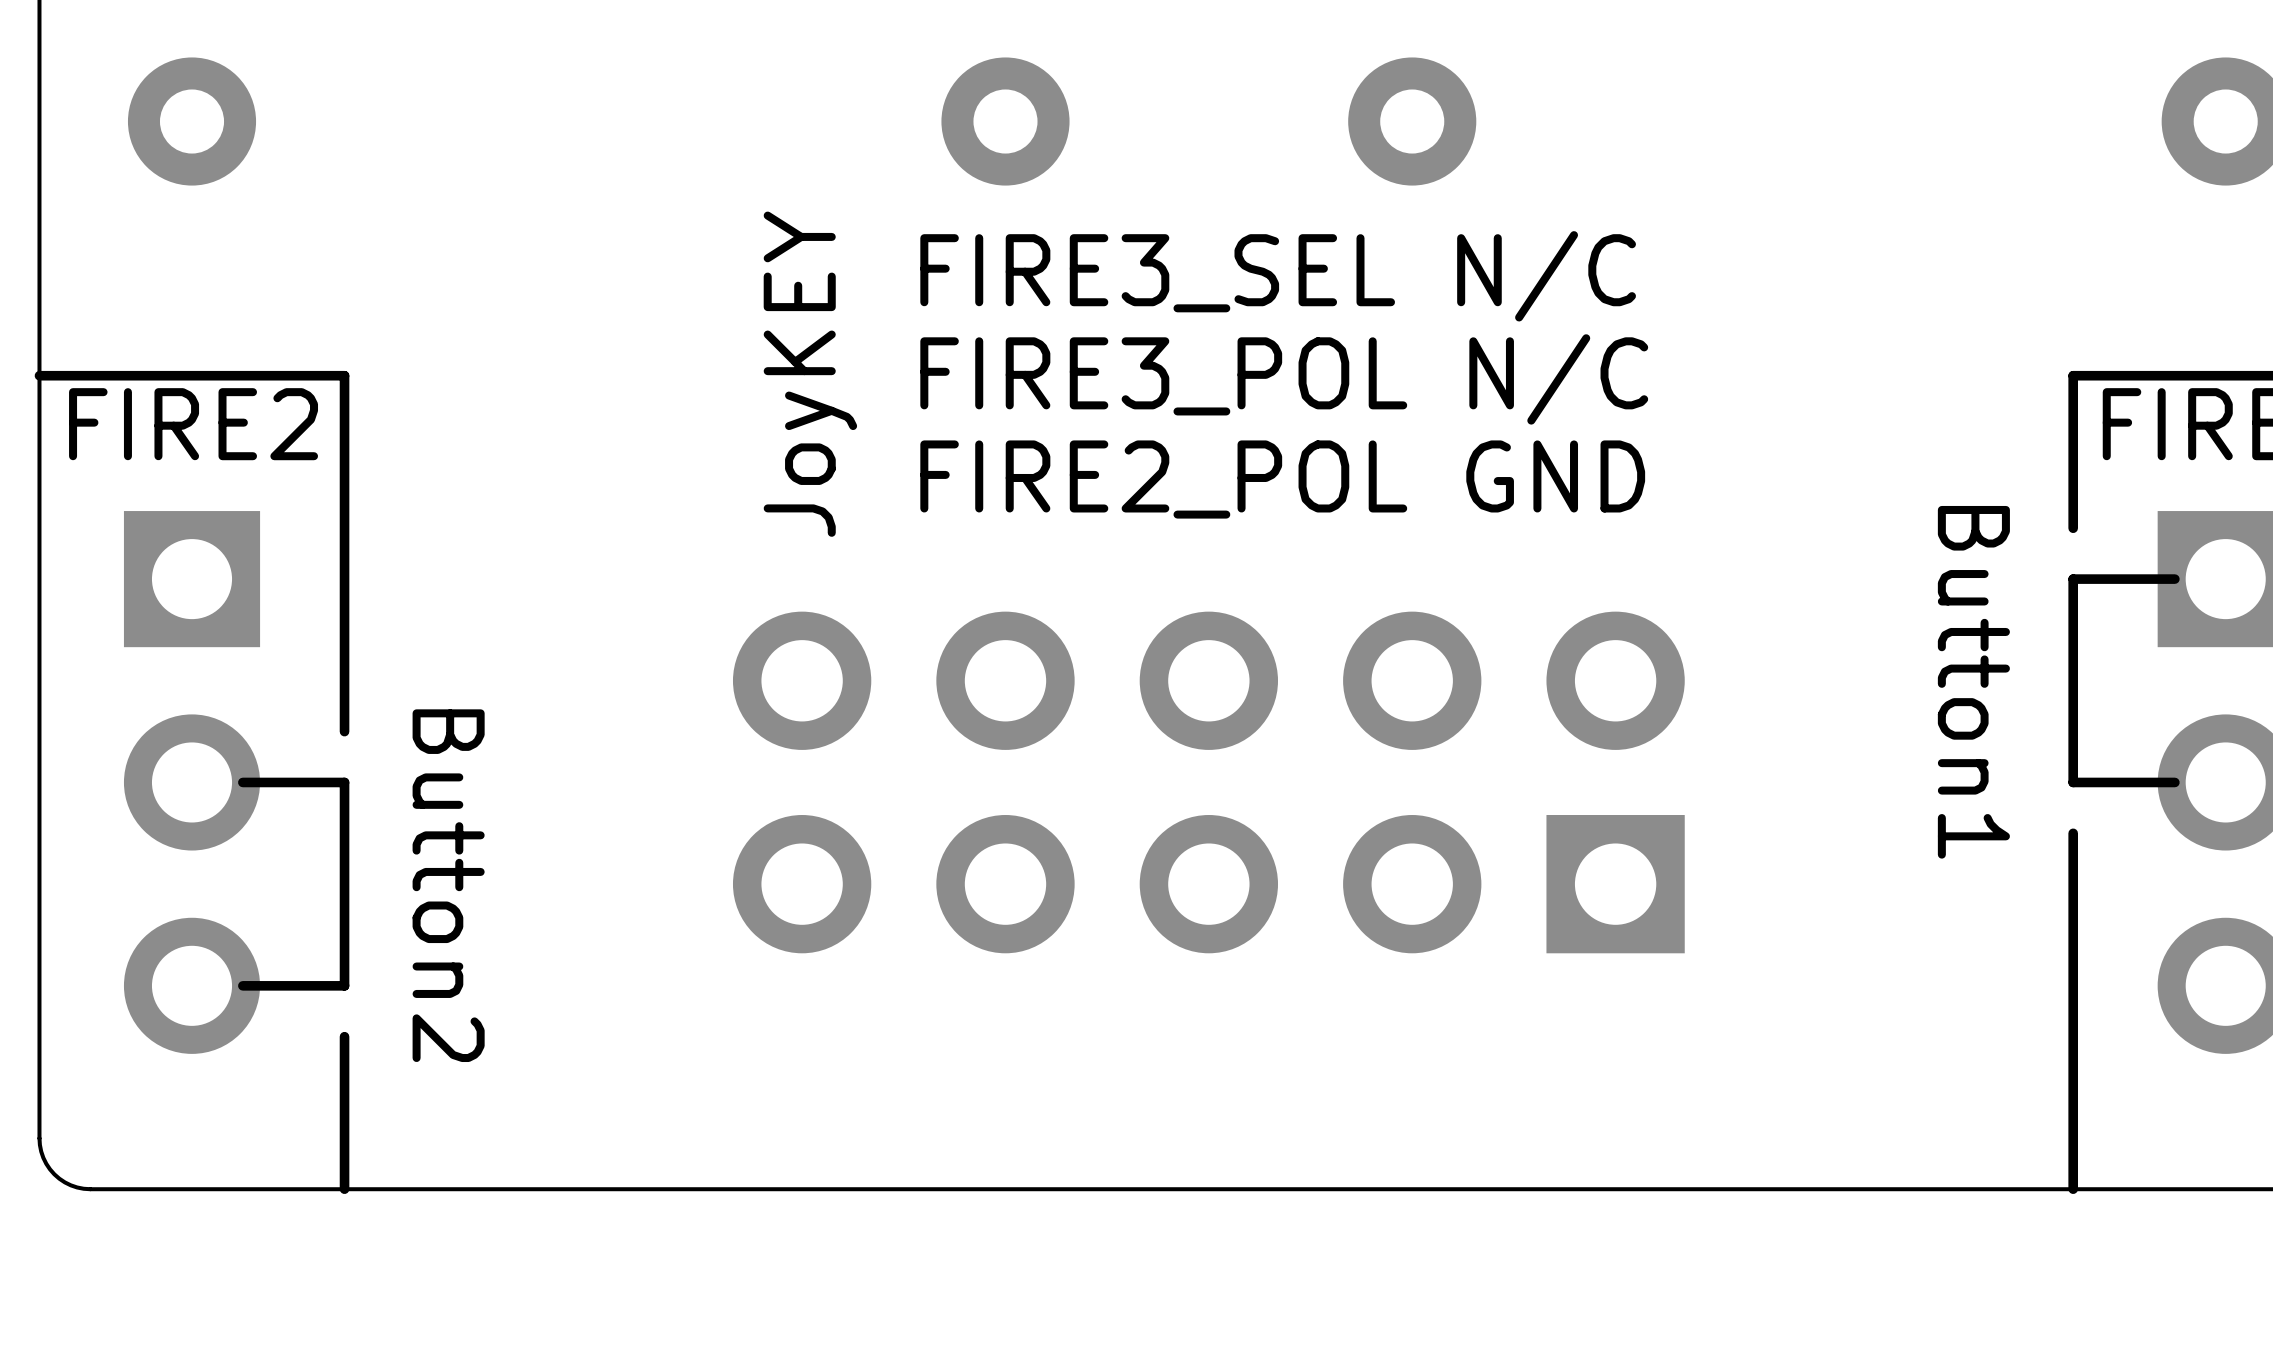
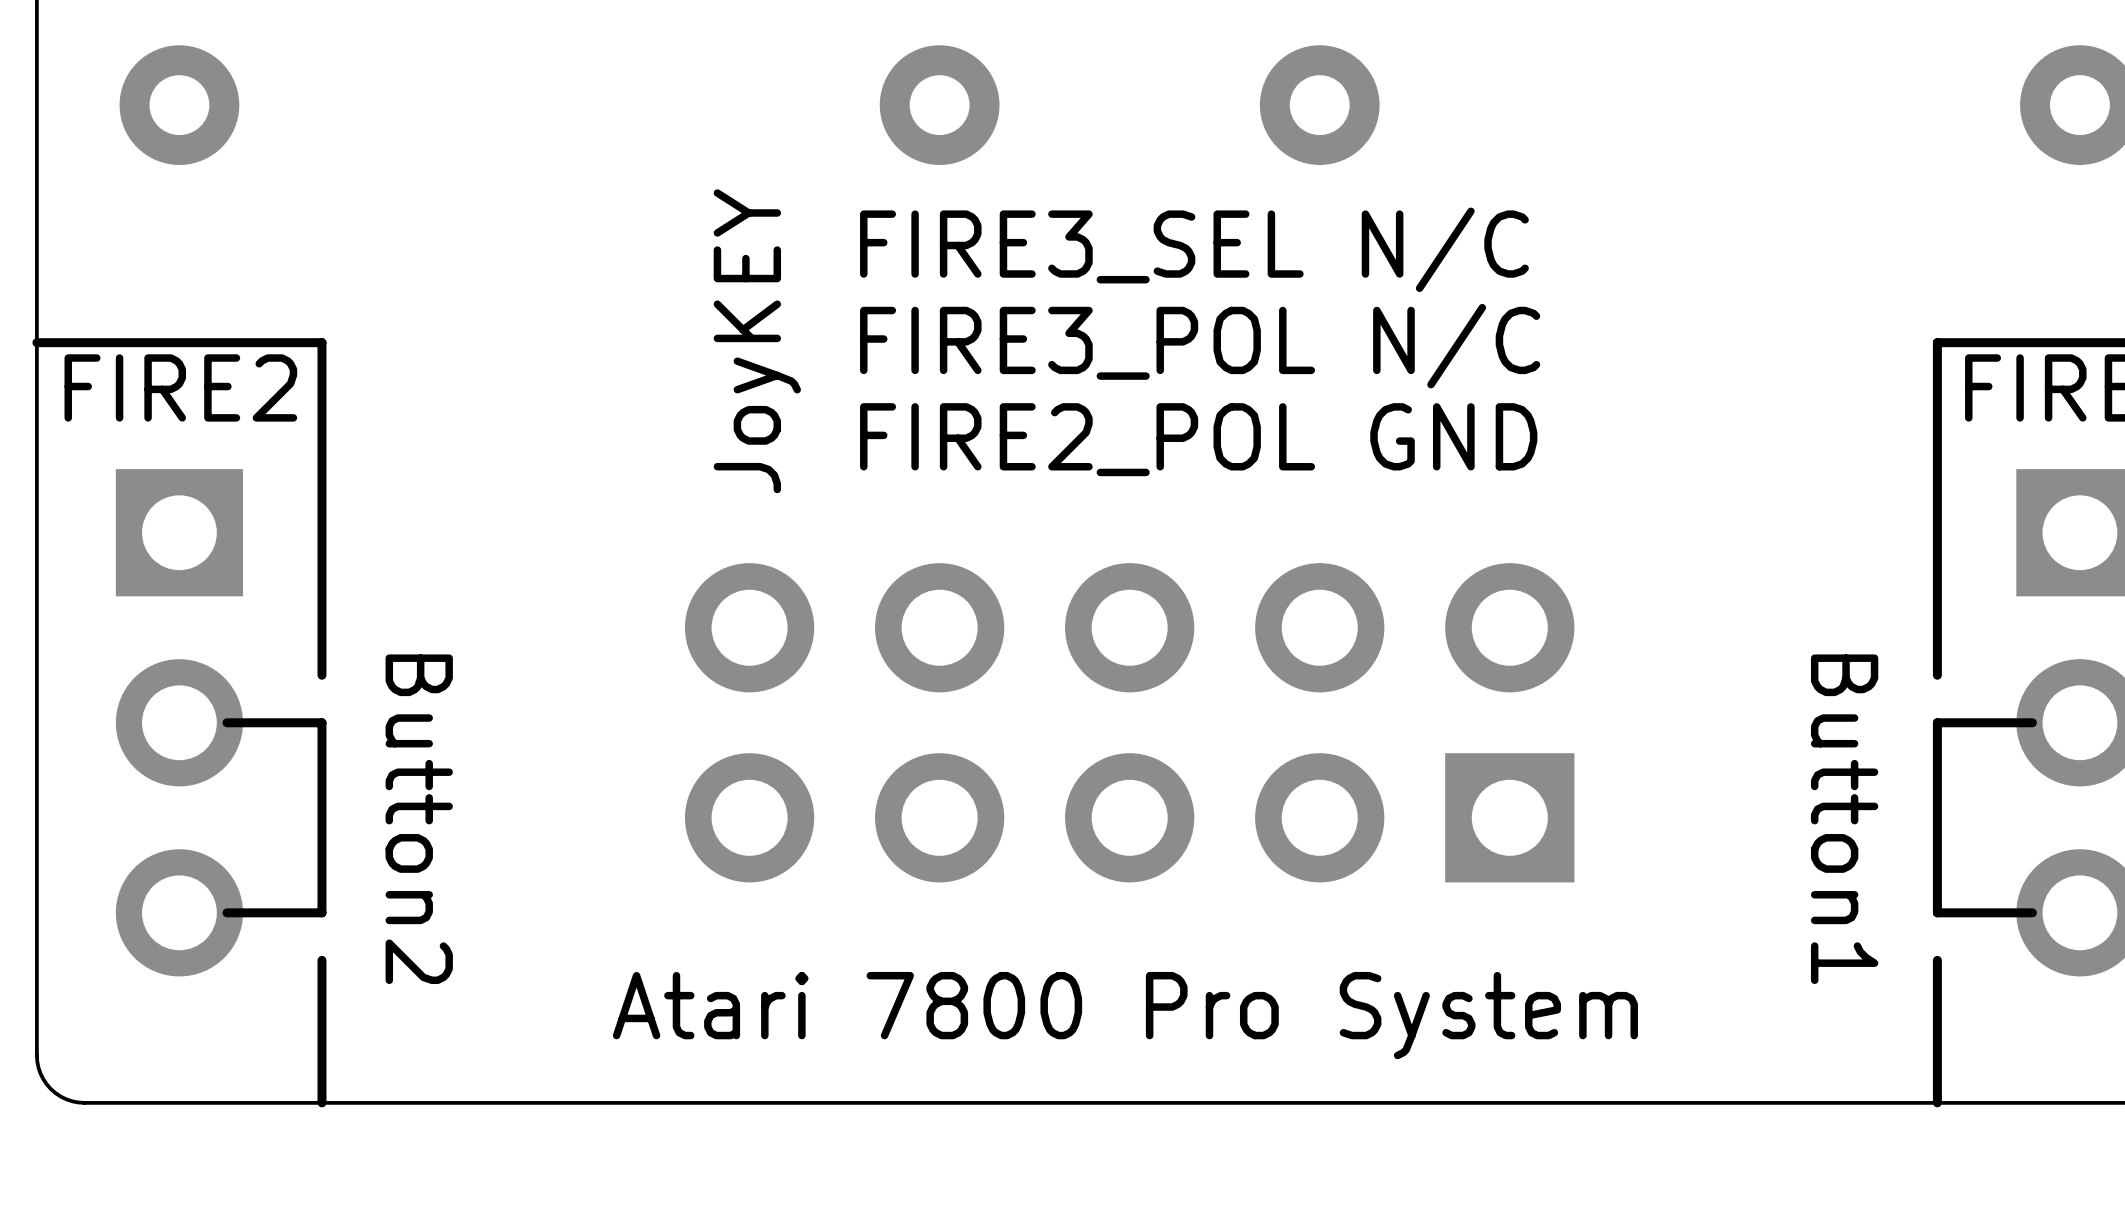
line: (2174, 579) (2073, 579) -> (1937, 485) (1937, 532)
text position: Button1 (1973, 682) -> Button1 (1844, 819)
line: (2073, 731) (2073, 782) -> (1937, 770) (1937, 722)
line: (2073, 985) (2073, 1036) -> (1937, 912) (2032, 912)
text: none -> Atari 7800 Pro System (1125, 1015)

